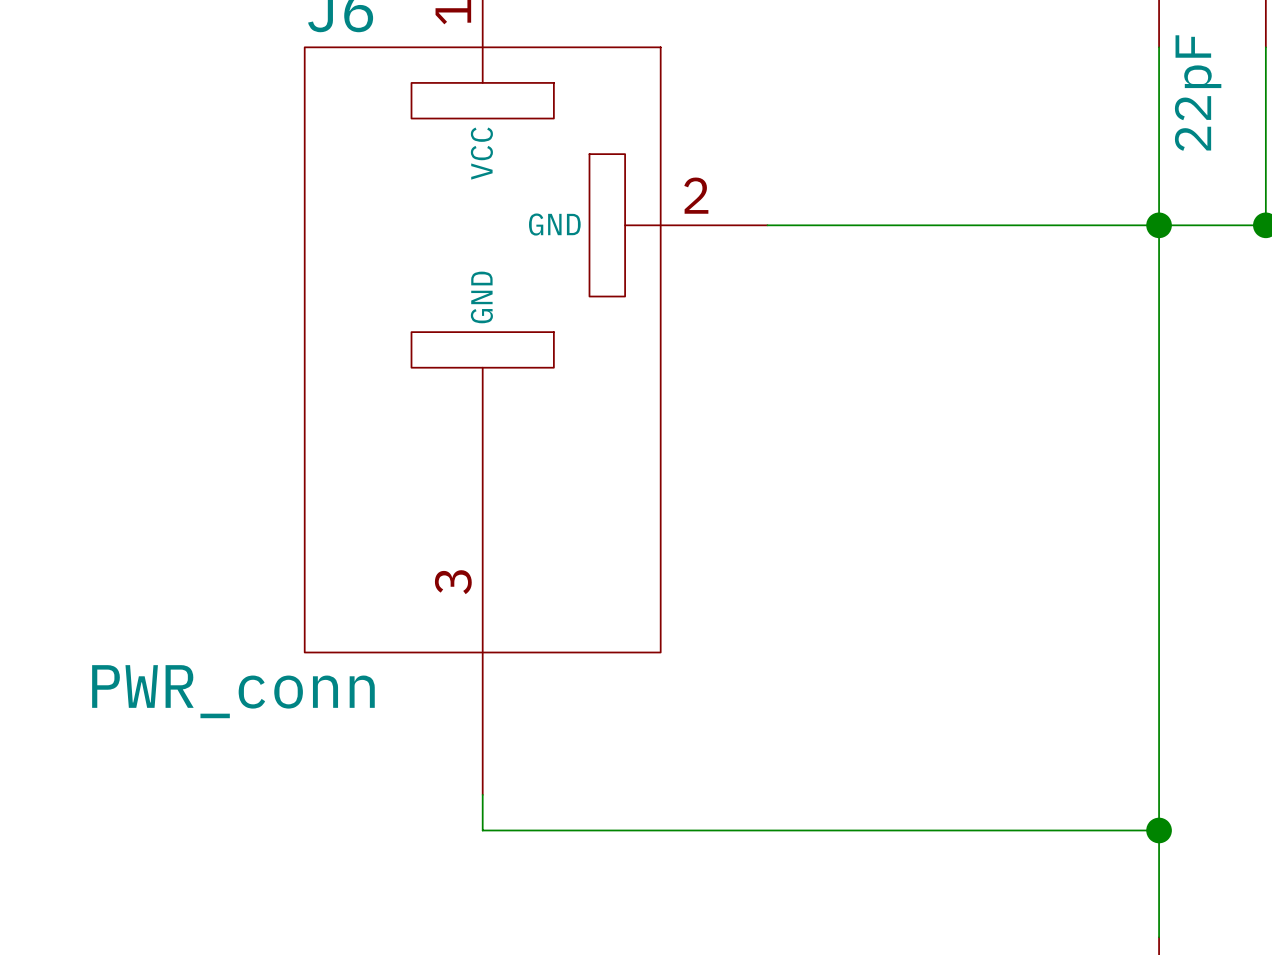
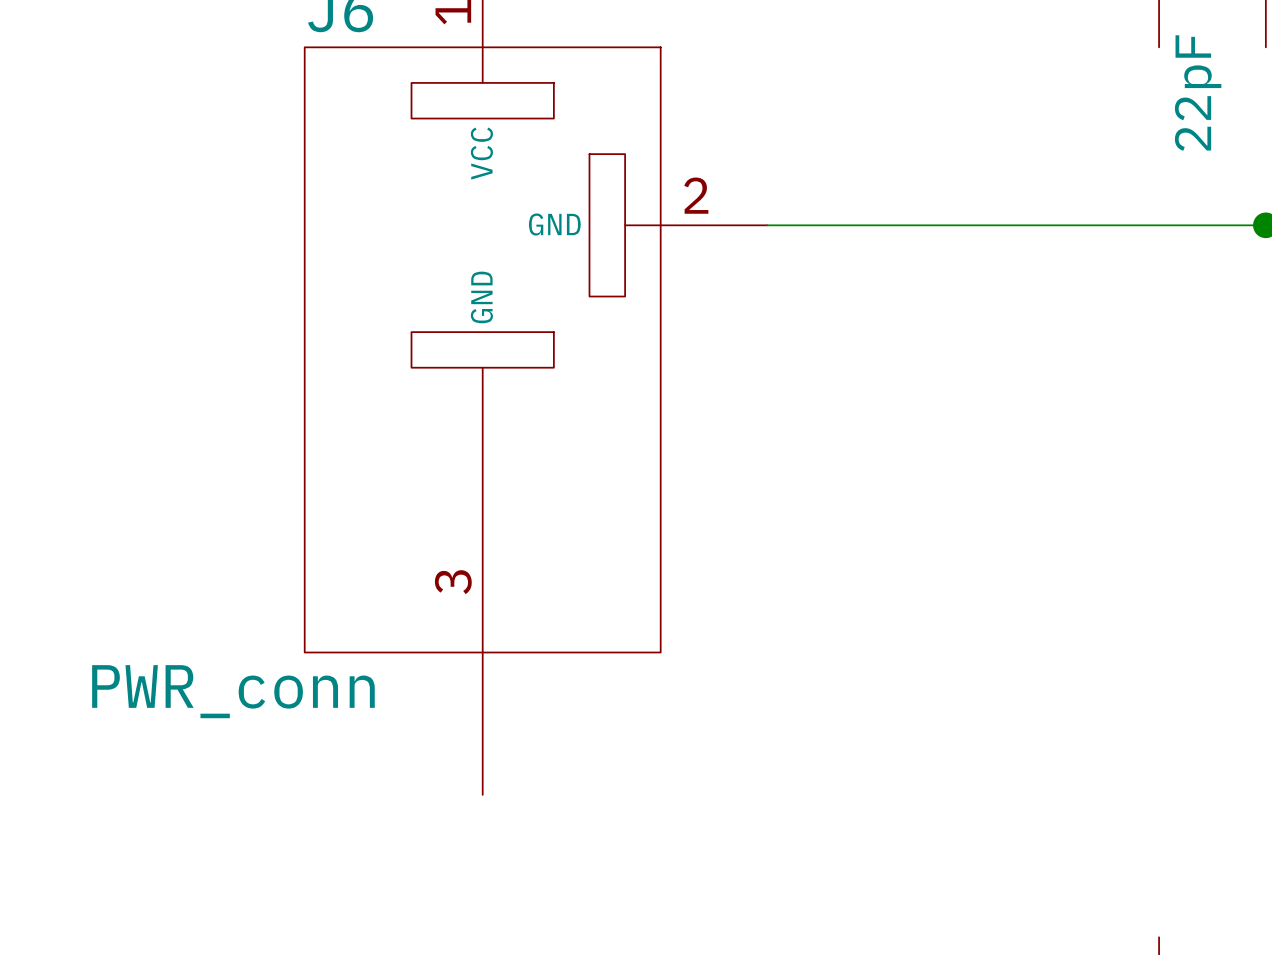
wire: (1159, 47) (1159, 937) -> none
wire: (1265, 47) (1265, 225) -> none
junction: (1159, 225) -> none
wire: (482, 794) (482, 830) (1159, 830) -> none
junction: (1159, 830) -> none

